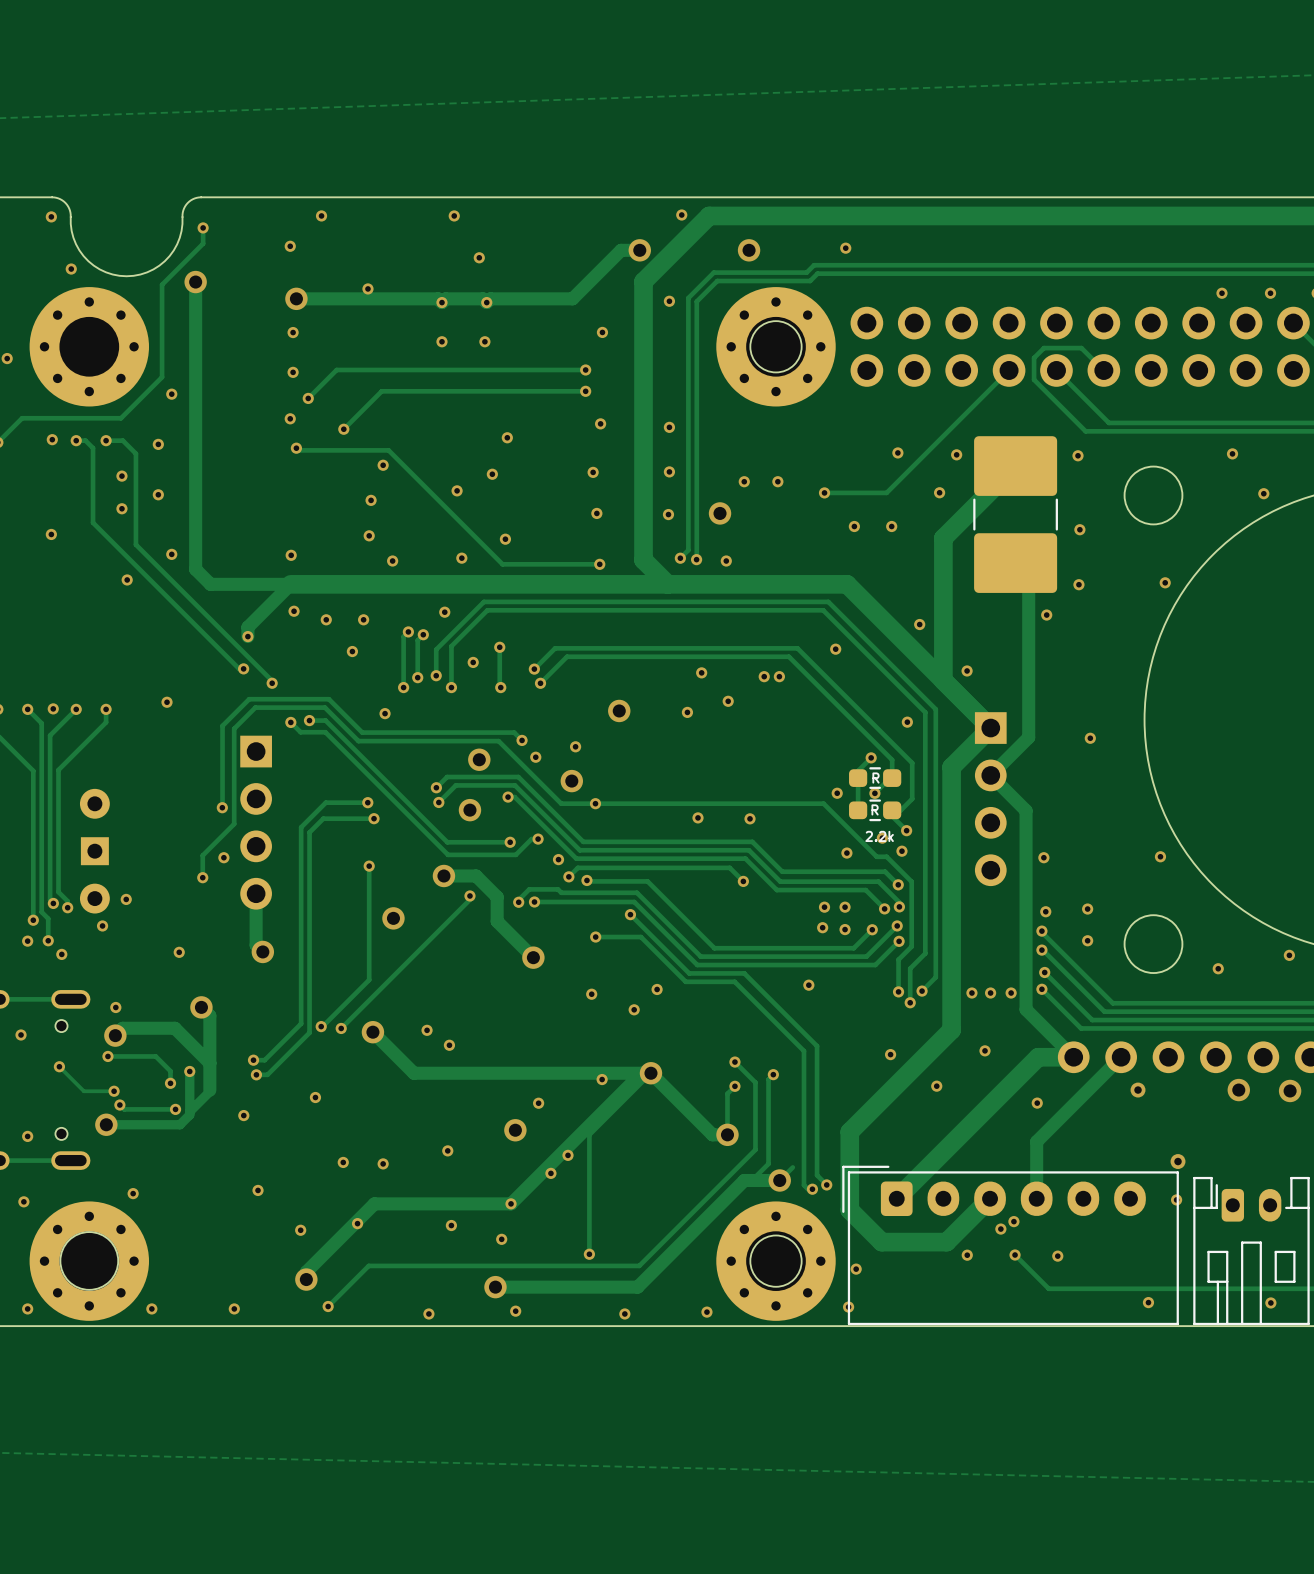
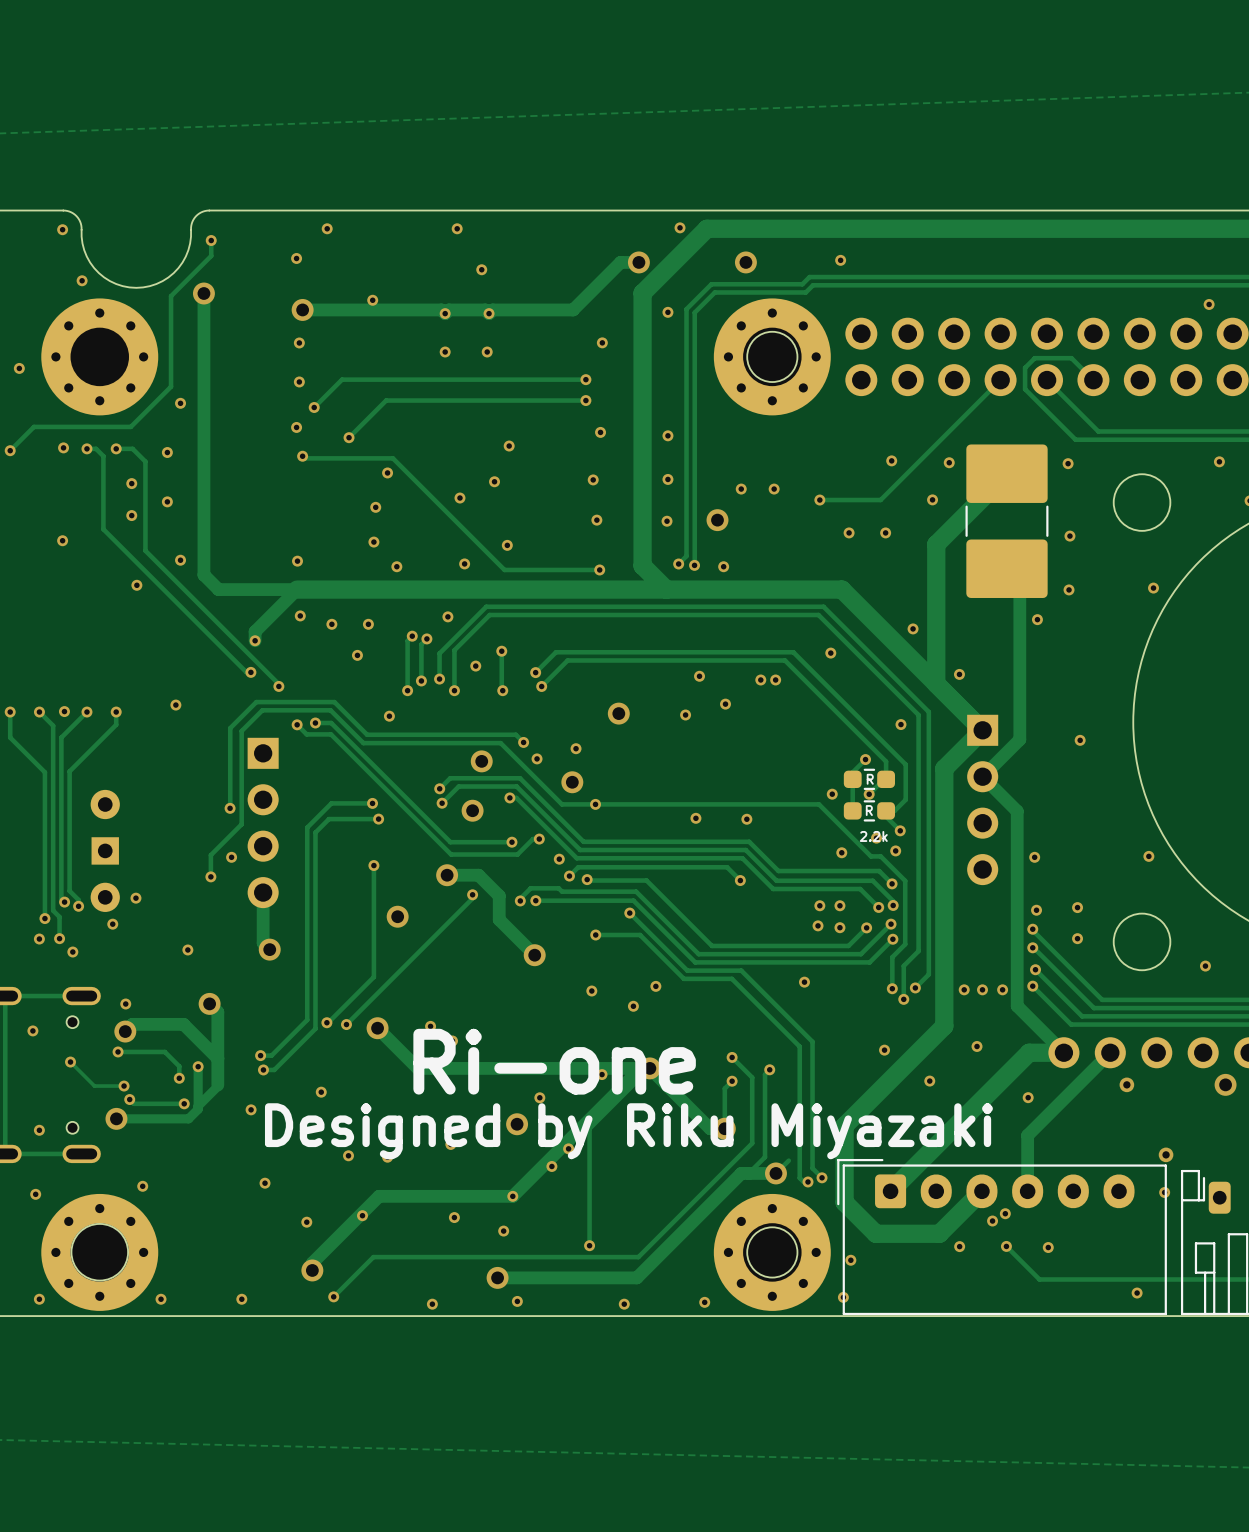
text: none -> Ri-one (554, 1061)
text: none -> Designed by Riku Miyazaki (628, 1131)

